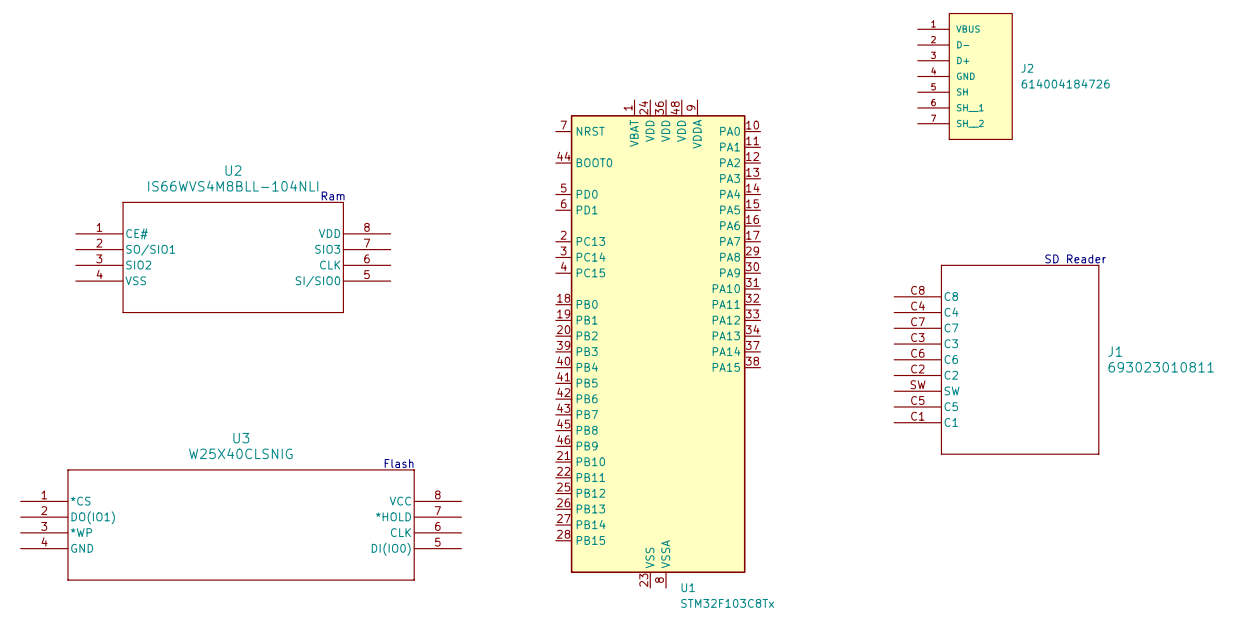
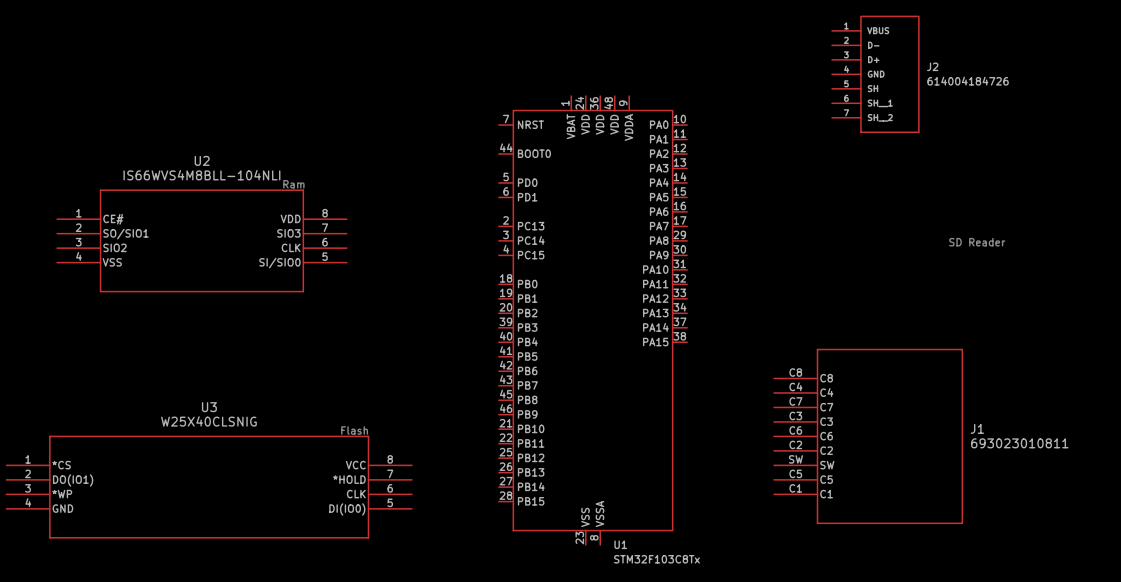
J1 position: (996, 359) -> (868, 436)

